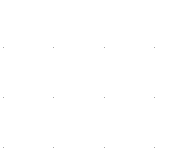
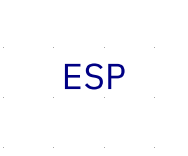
text: none -> ESP (94, 76)

